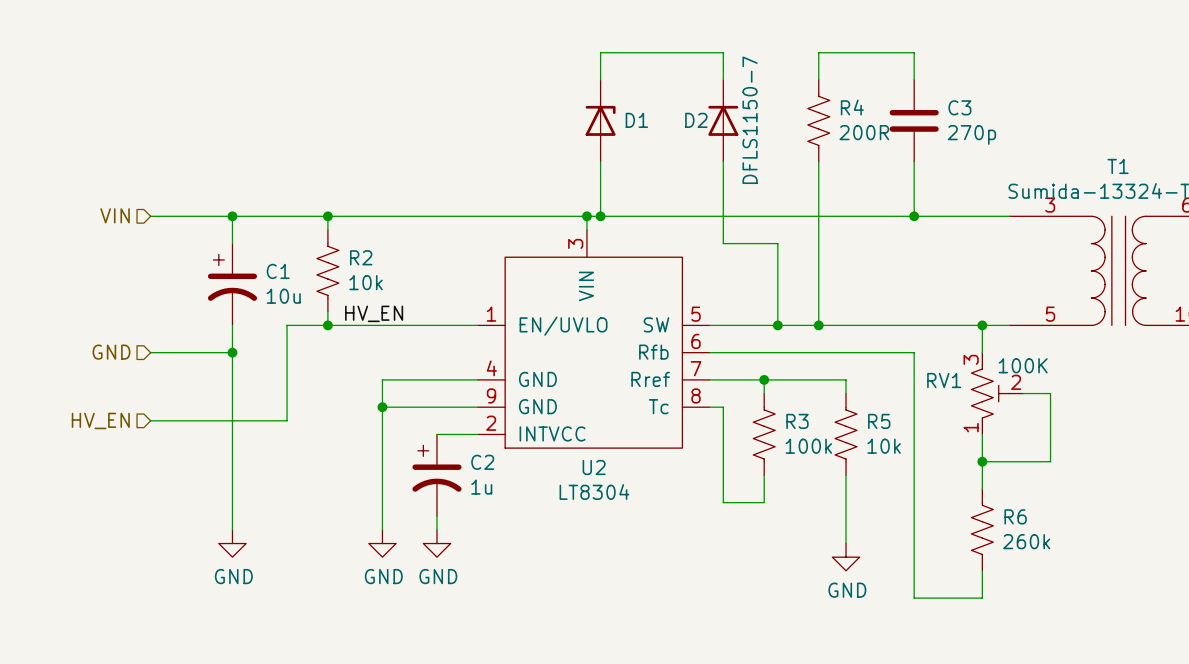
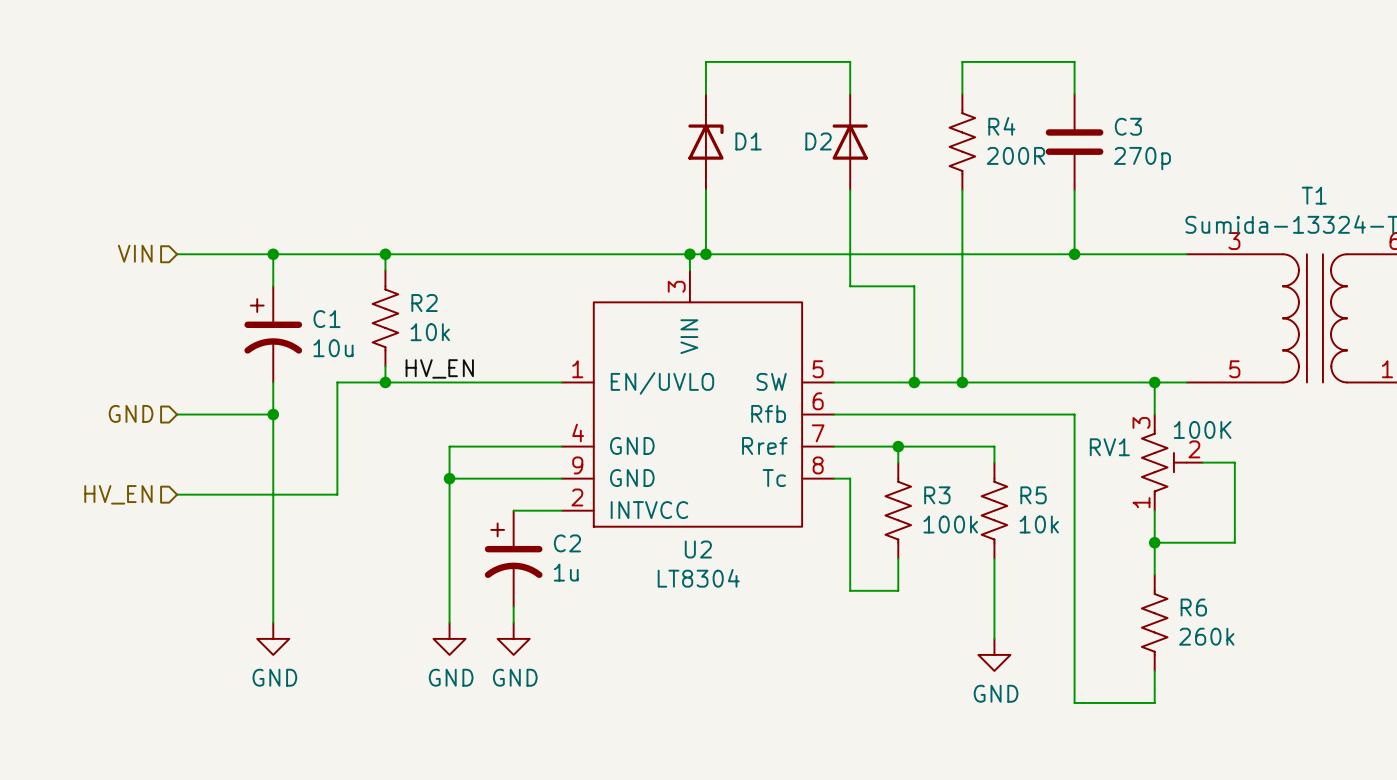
D2 value: DFLS1150-7 (750, 120) -> none

